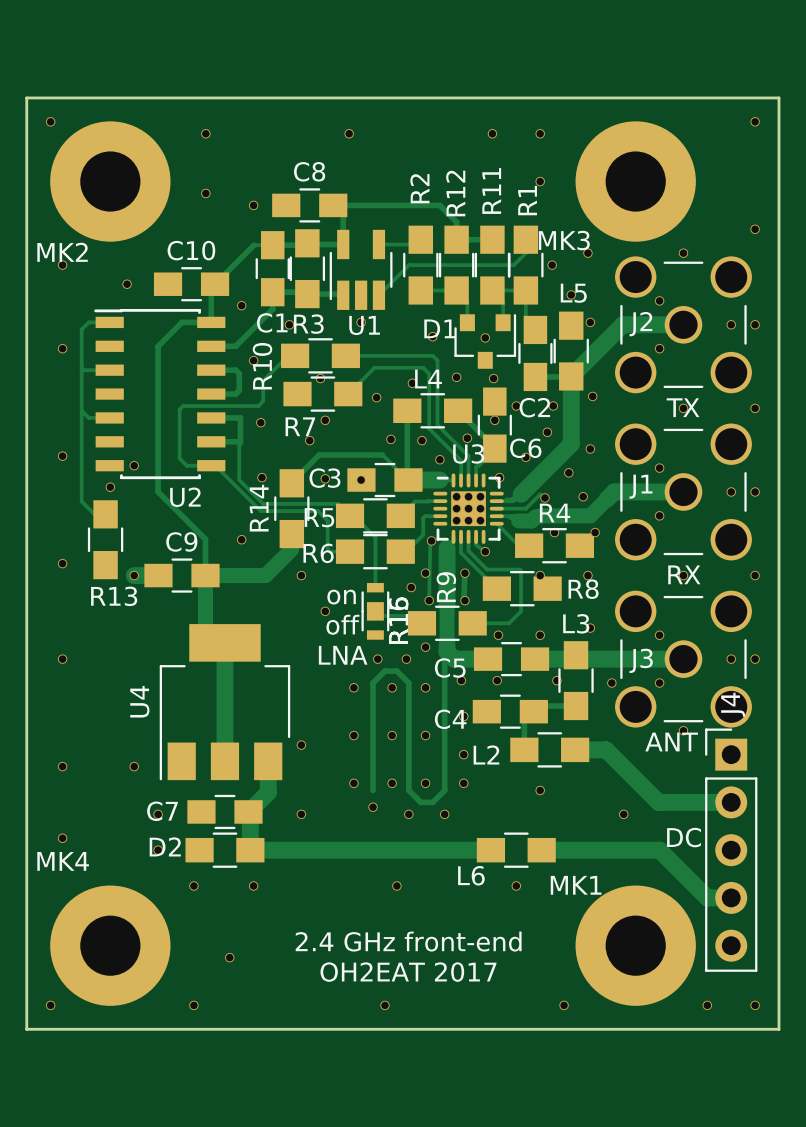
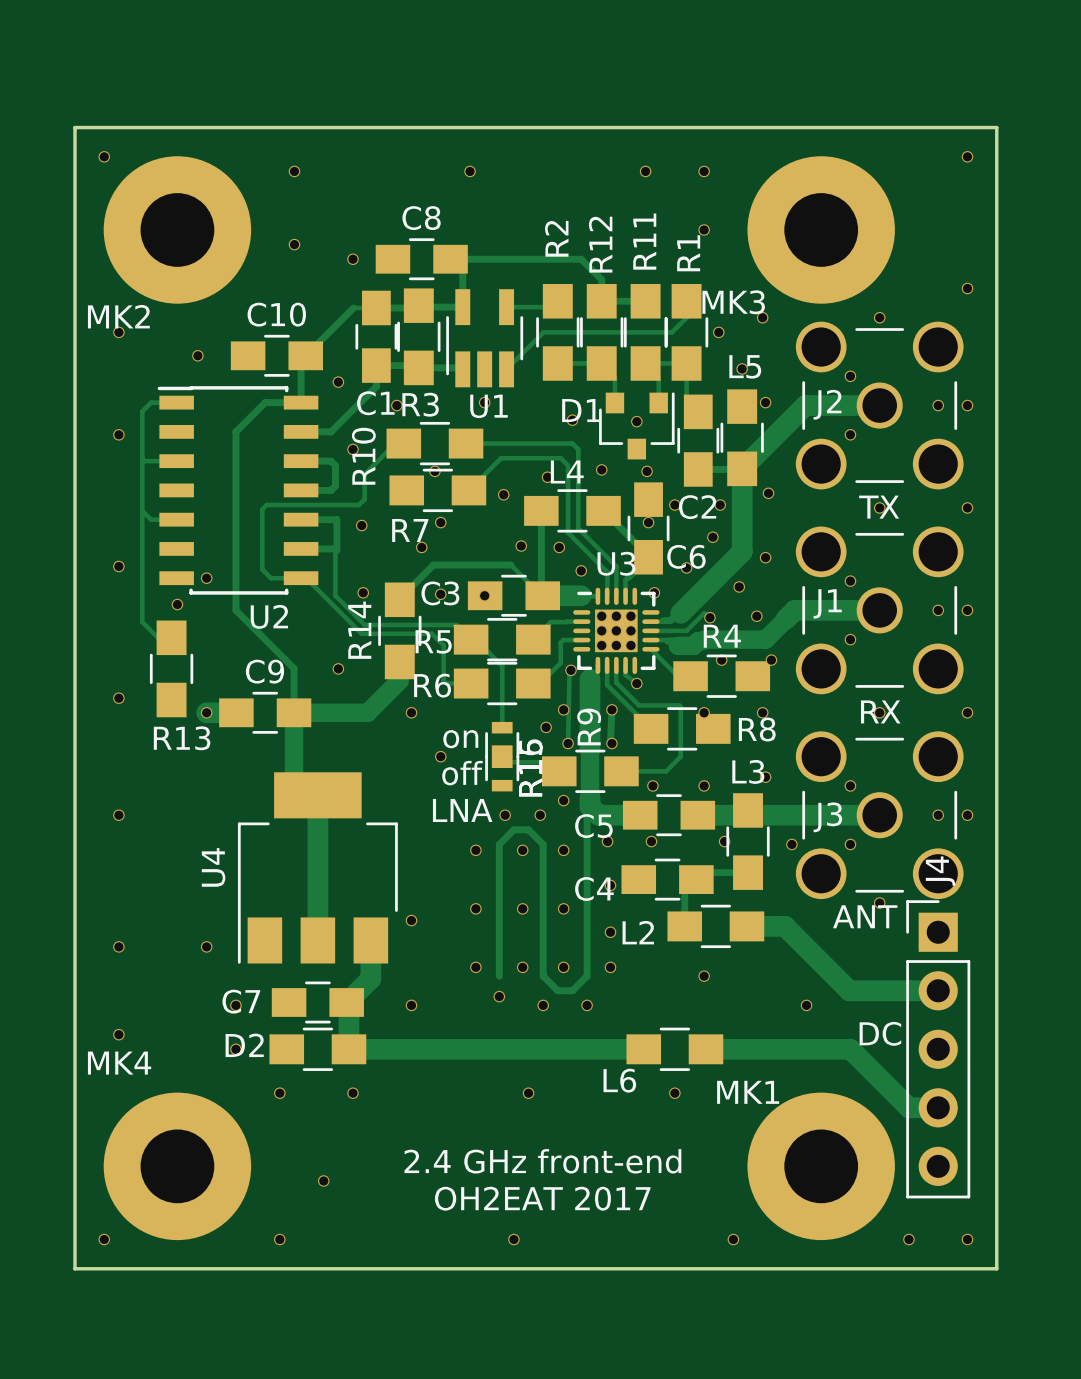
via: (467, 438) -> none

